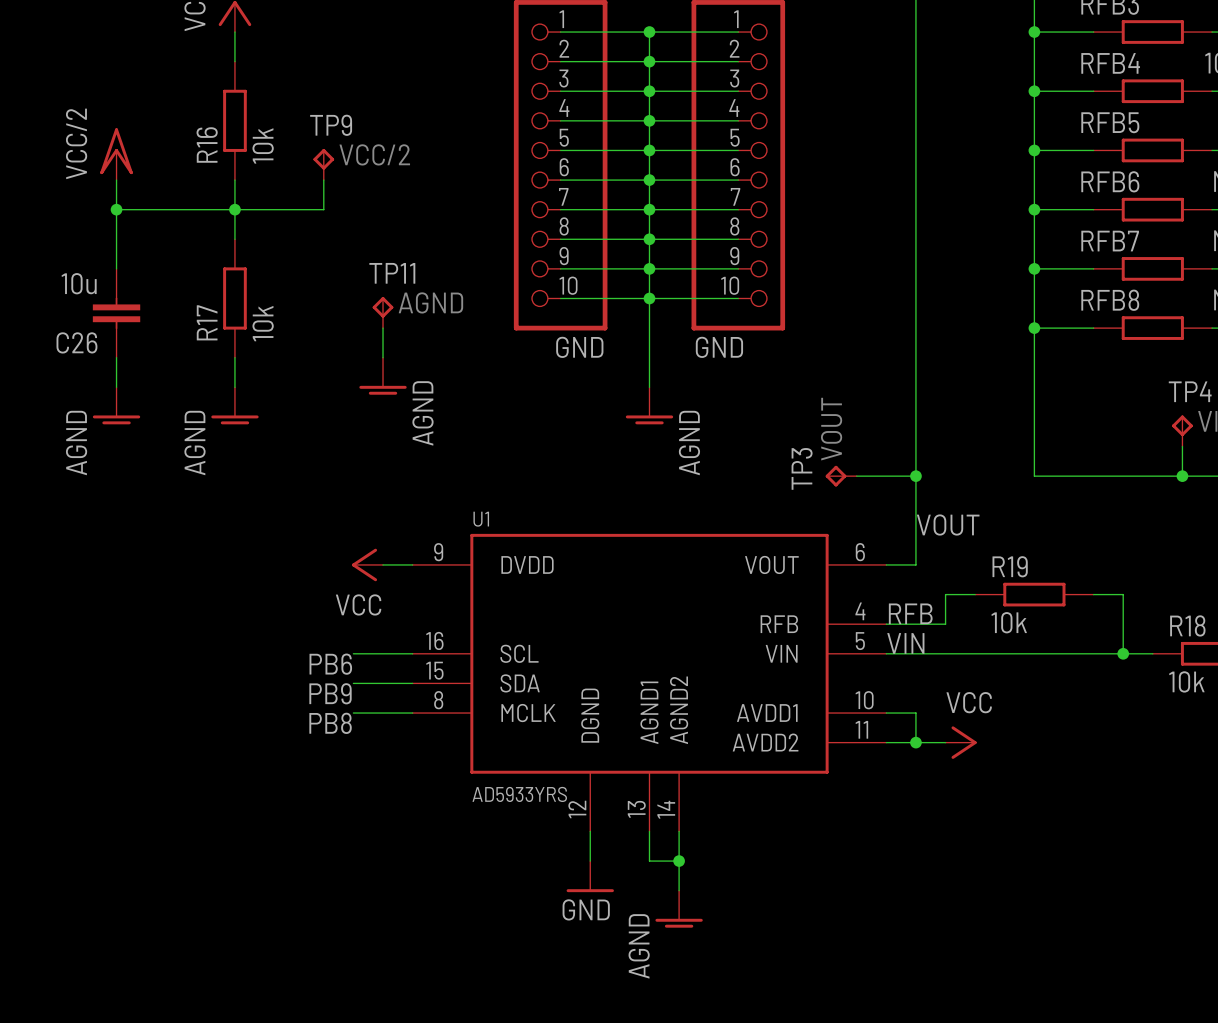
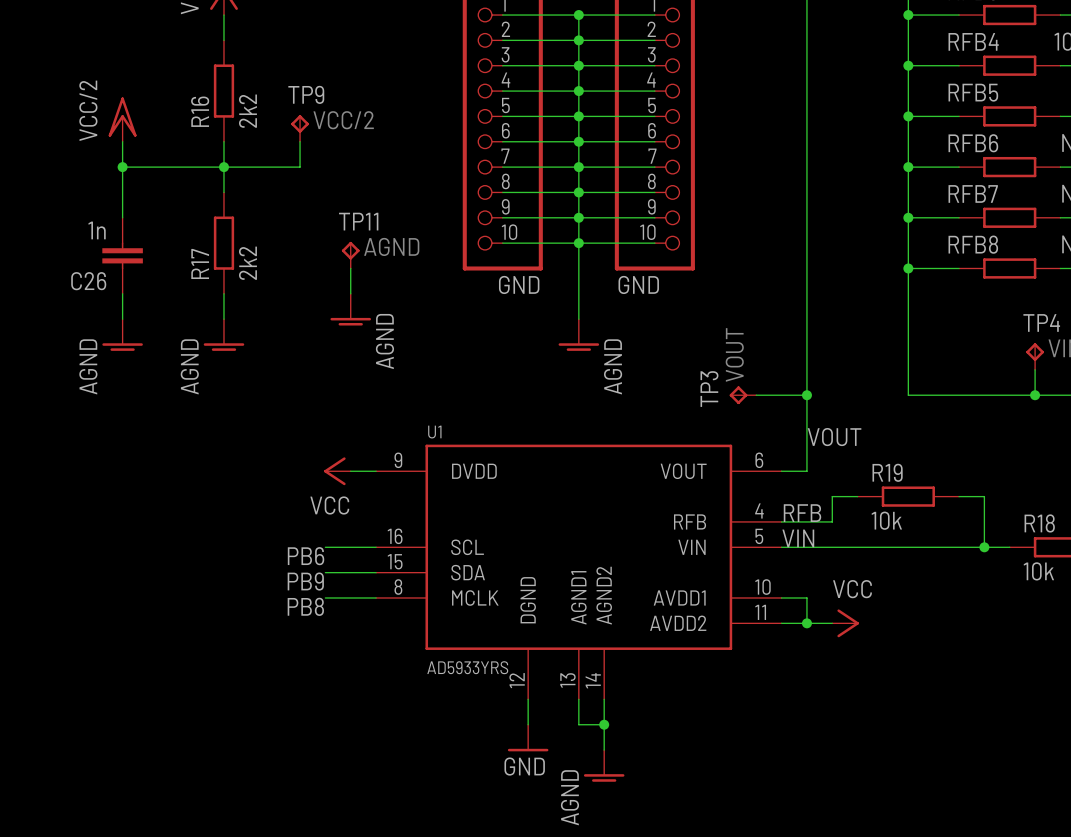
R16 value: 10k (263, 146) -> 2k2 (247, 111)
C26 value: 10u (79, 283) -> 1n (97, 230)
R17 value: 10k (263, 323) -> 2k2 (247, 263)

